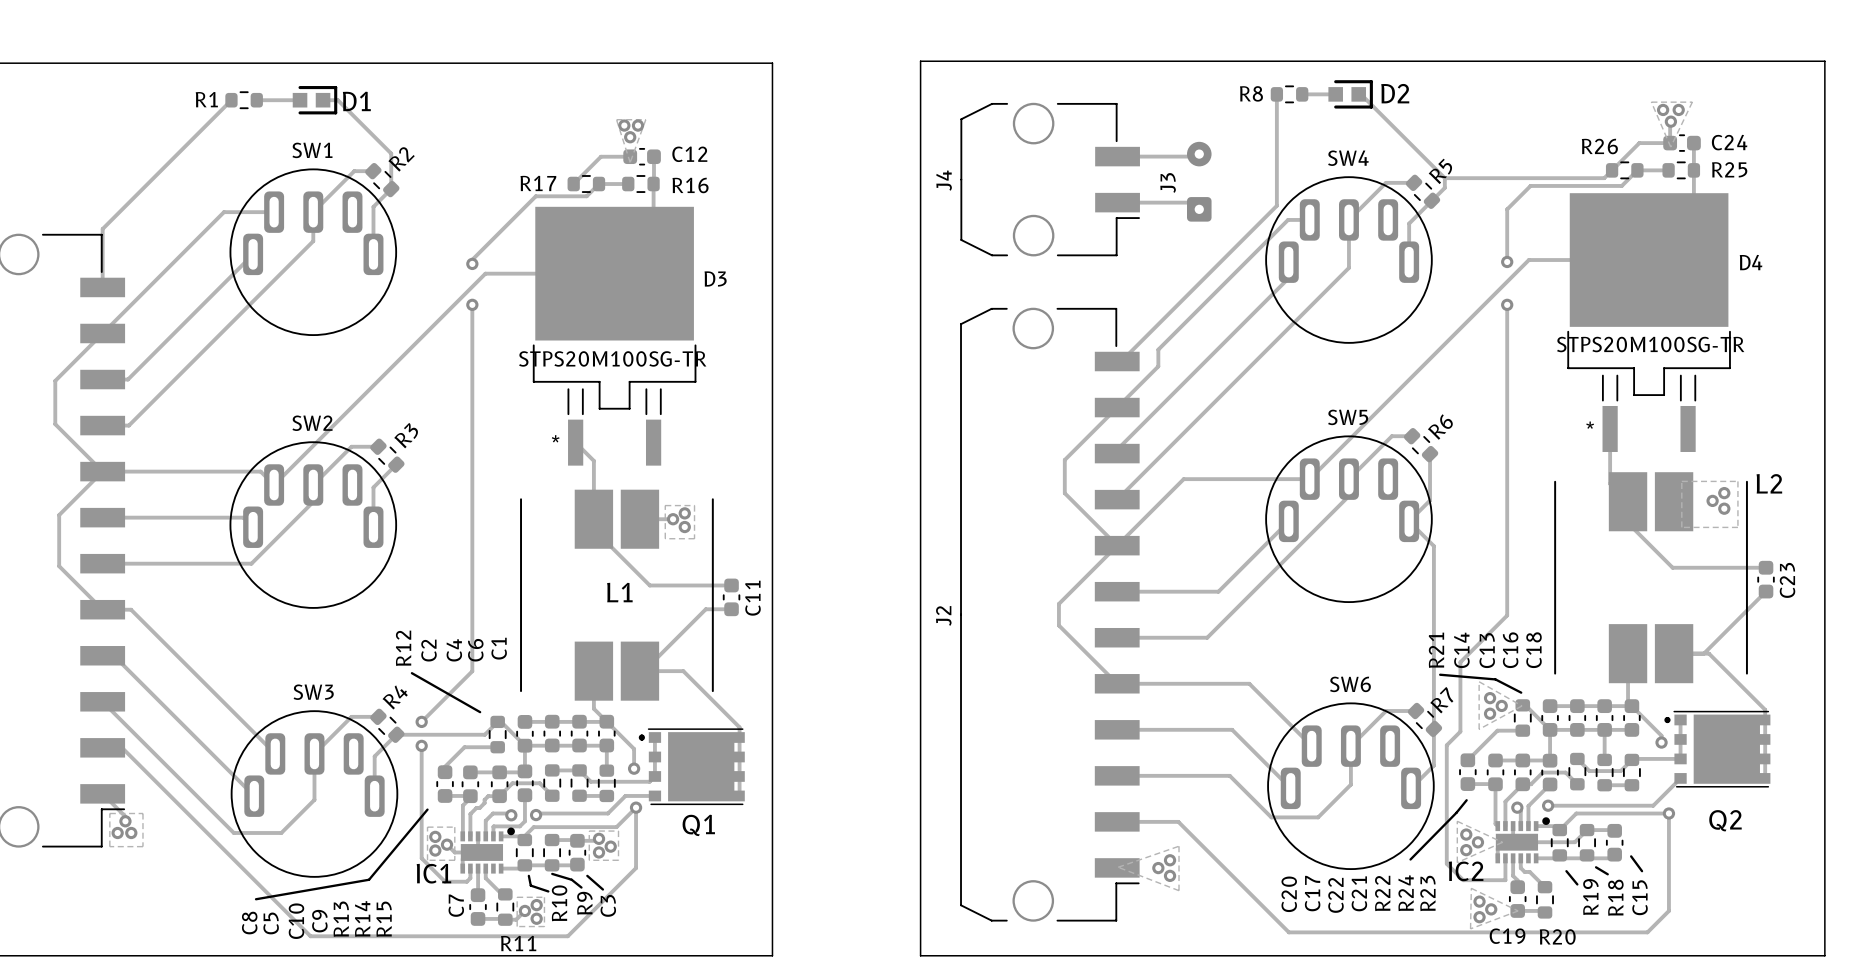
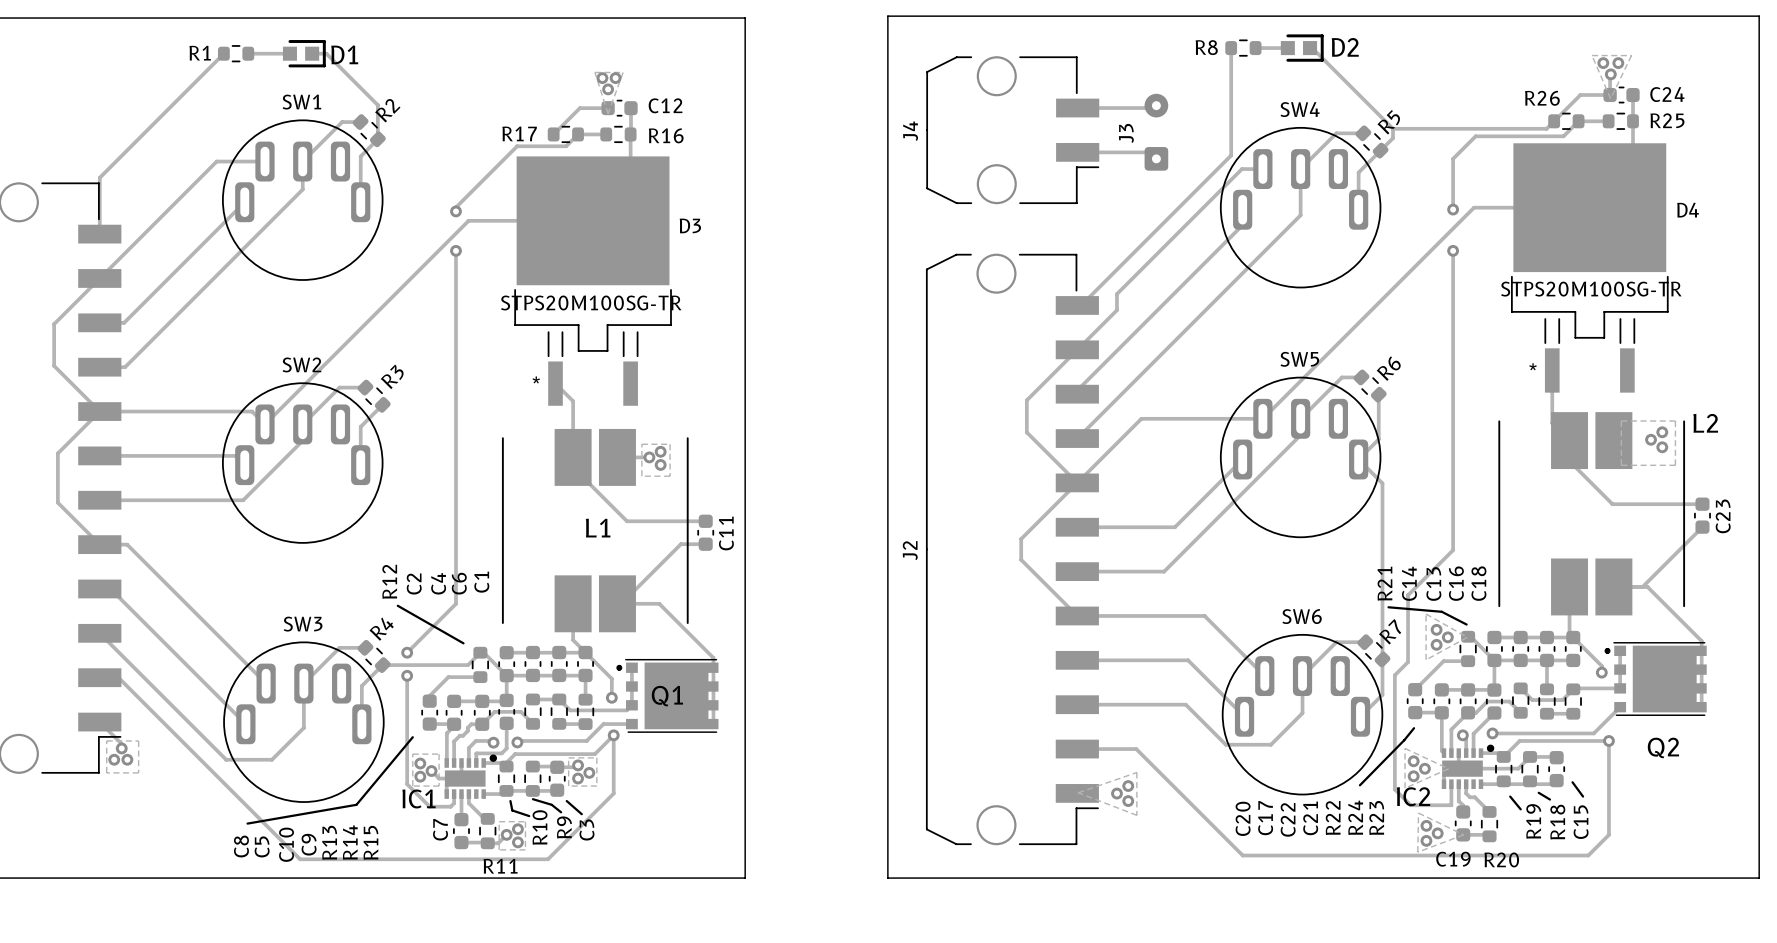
Q1 name position: Q1 (698, 825) -> Q1 (667, 696)

